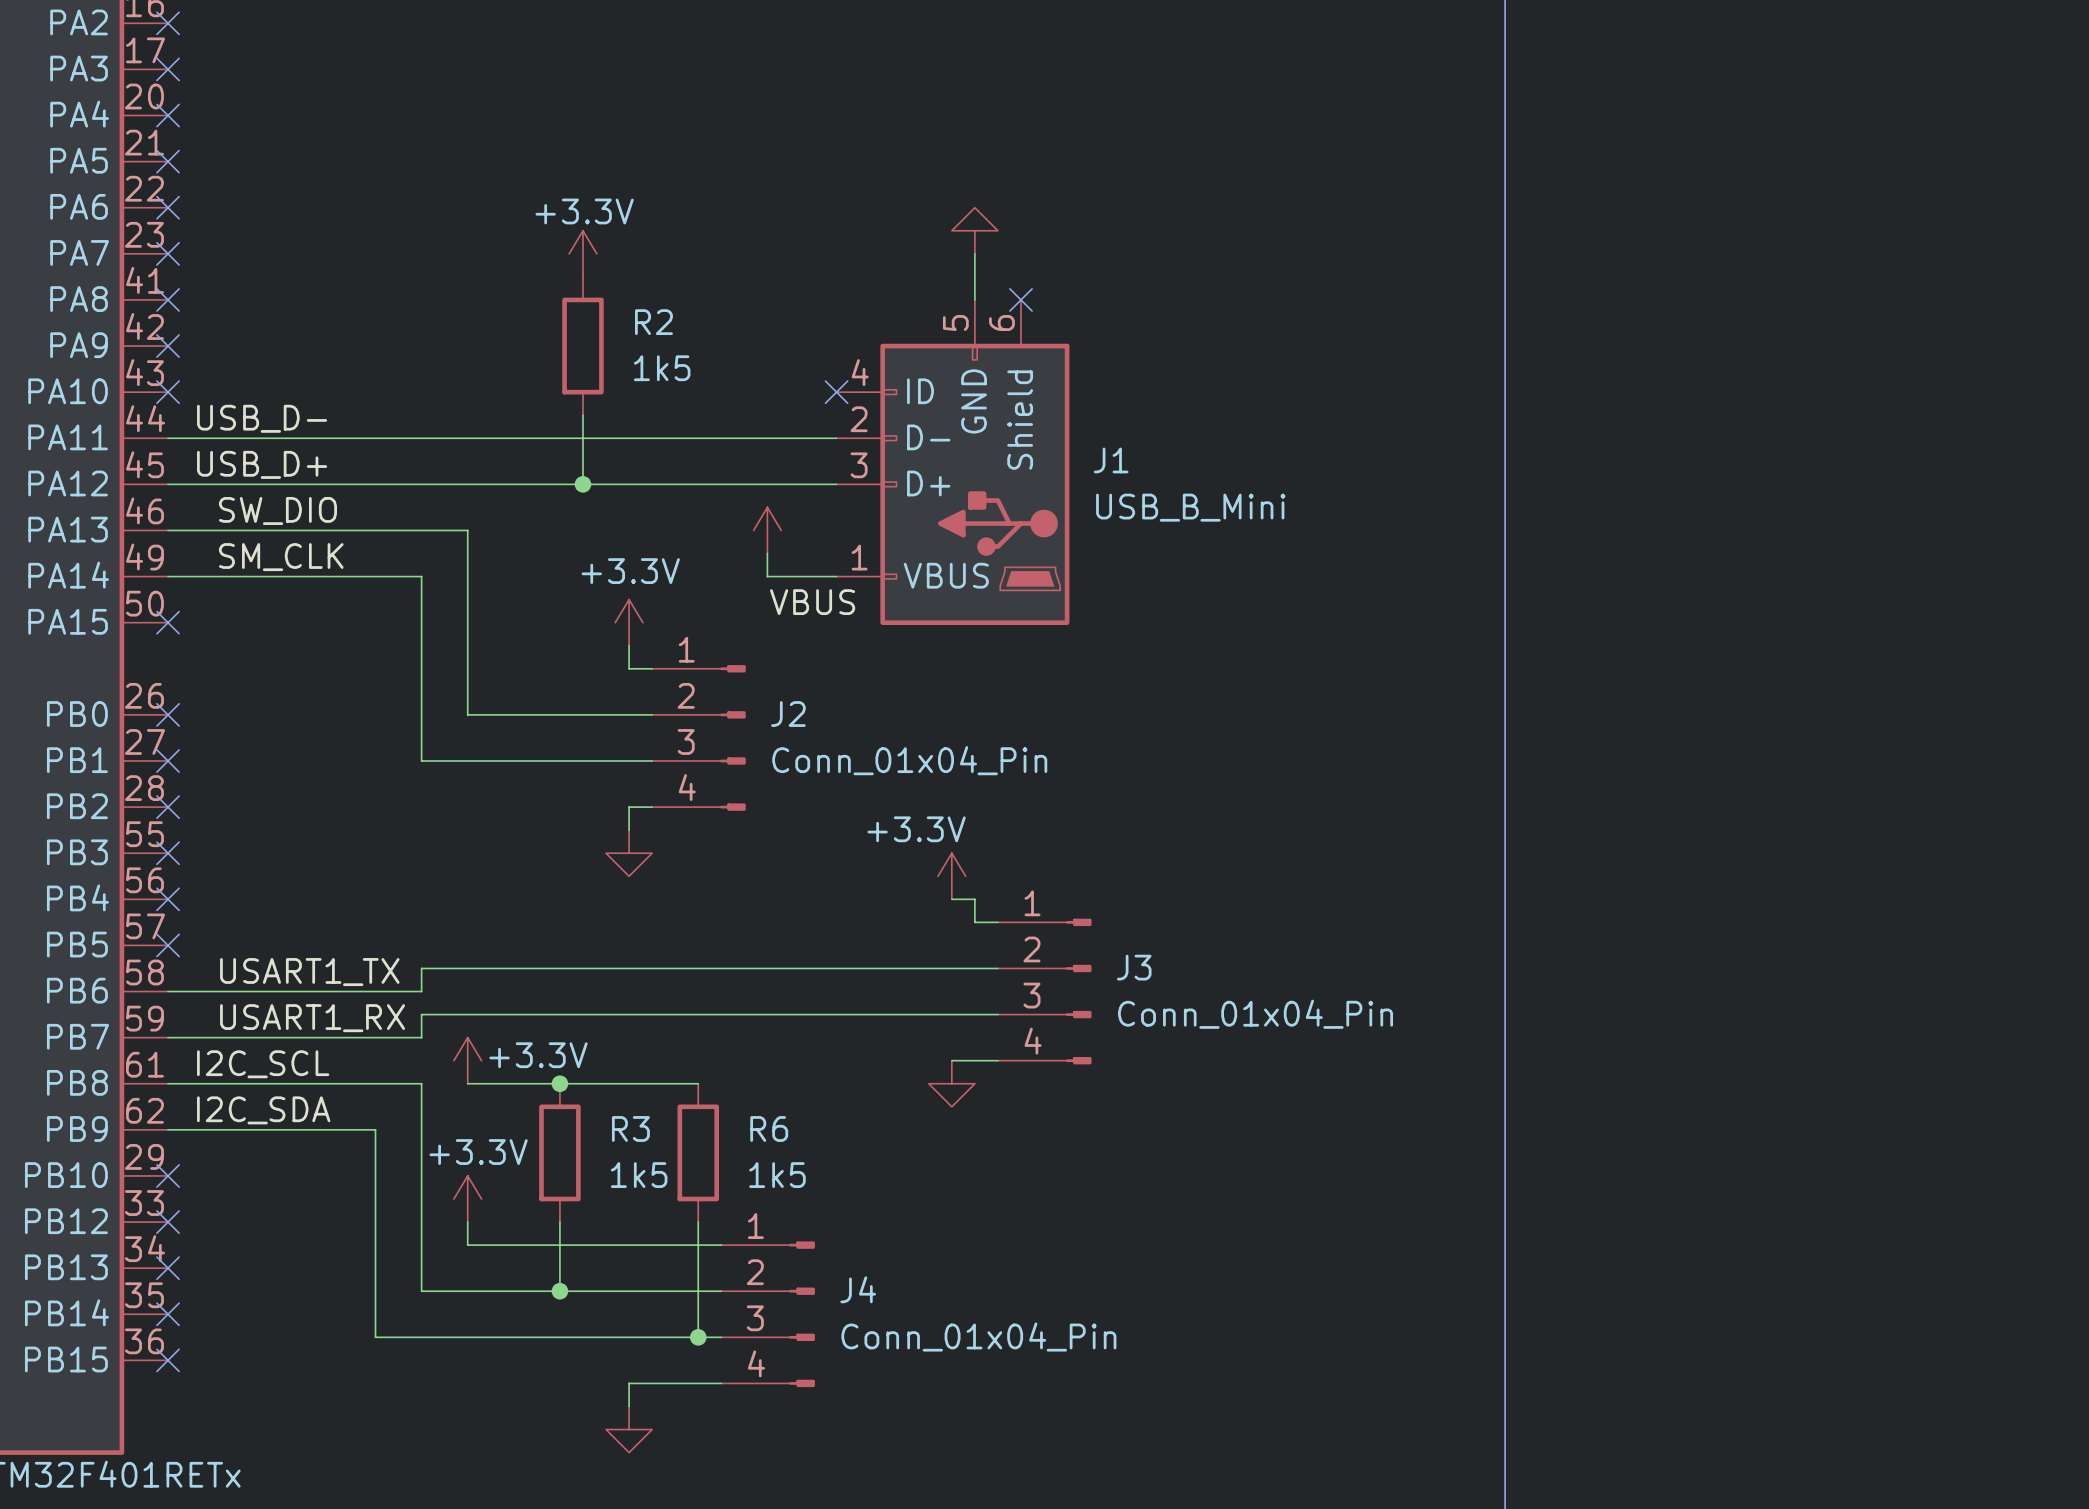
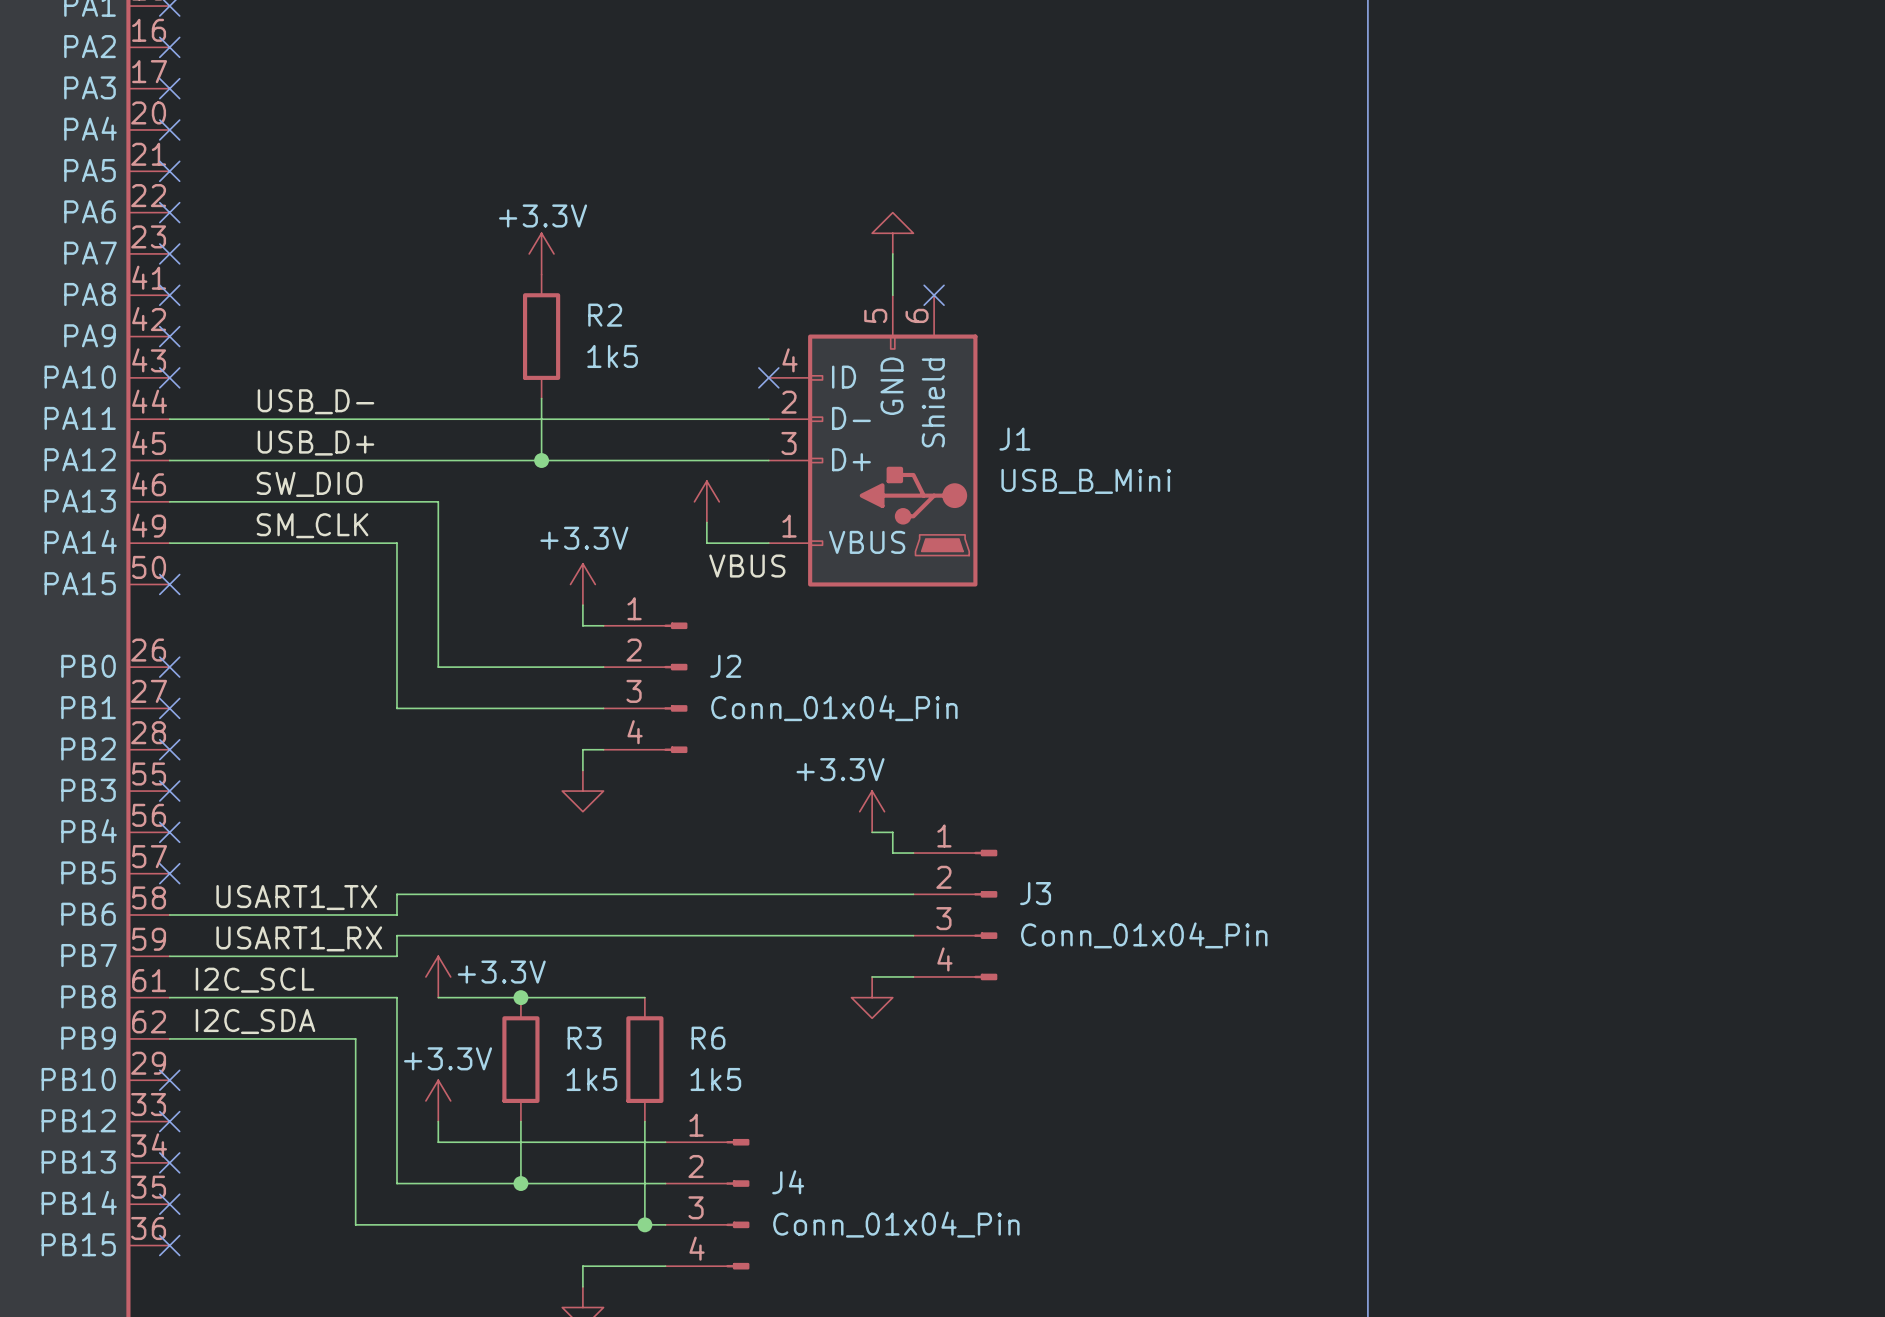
label position: USB_D- (262, 418) -> USB_D- (315, 401)
label position: USB_D+ (262, 464) -> USB_D+ (315, 443)
label position: SW_DIO (277, 510) -> SW_DIO (309, 484)
label position: SM_CLK (281, 557) -> SM_CLK (312, 525)

